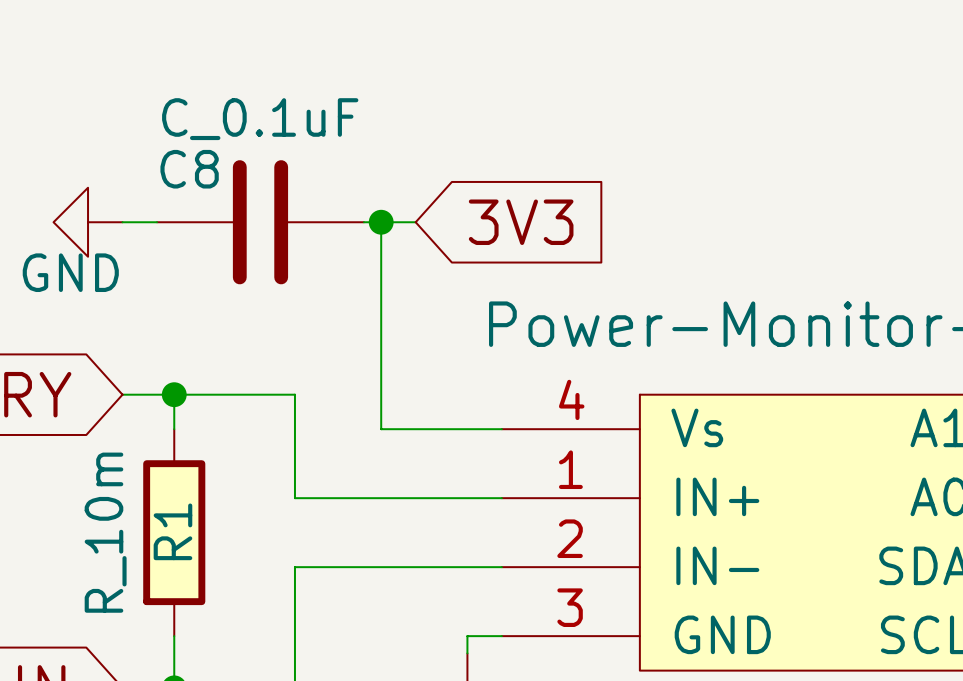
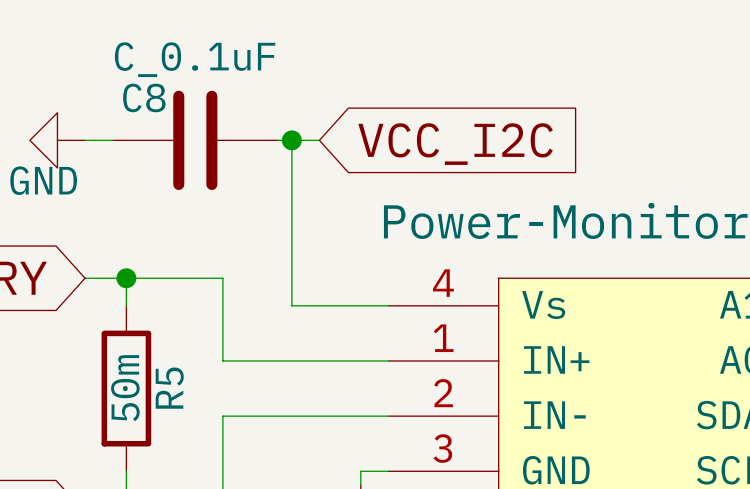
global label: 3V3 (521, 222) -> VCC_I2C (455, 144)
R1: R_10m (174, 532) -> none
R5: none -> 50m (126, 388)

